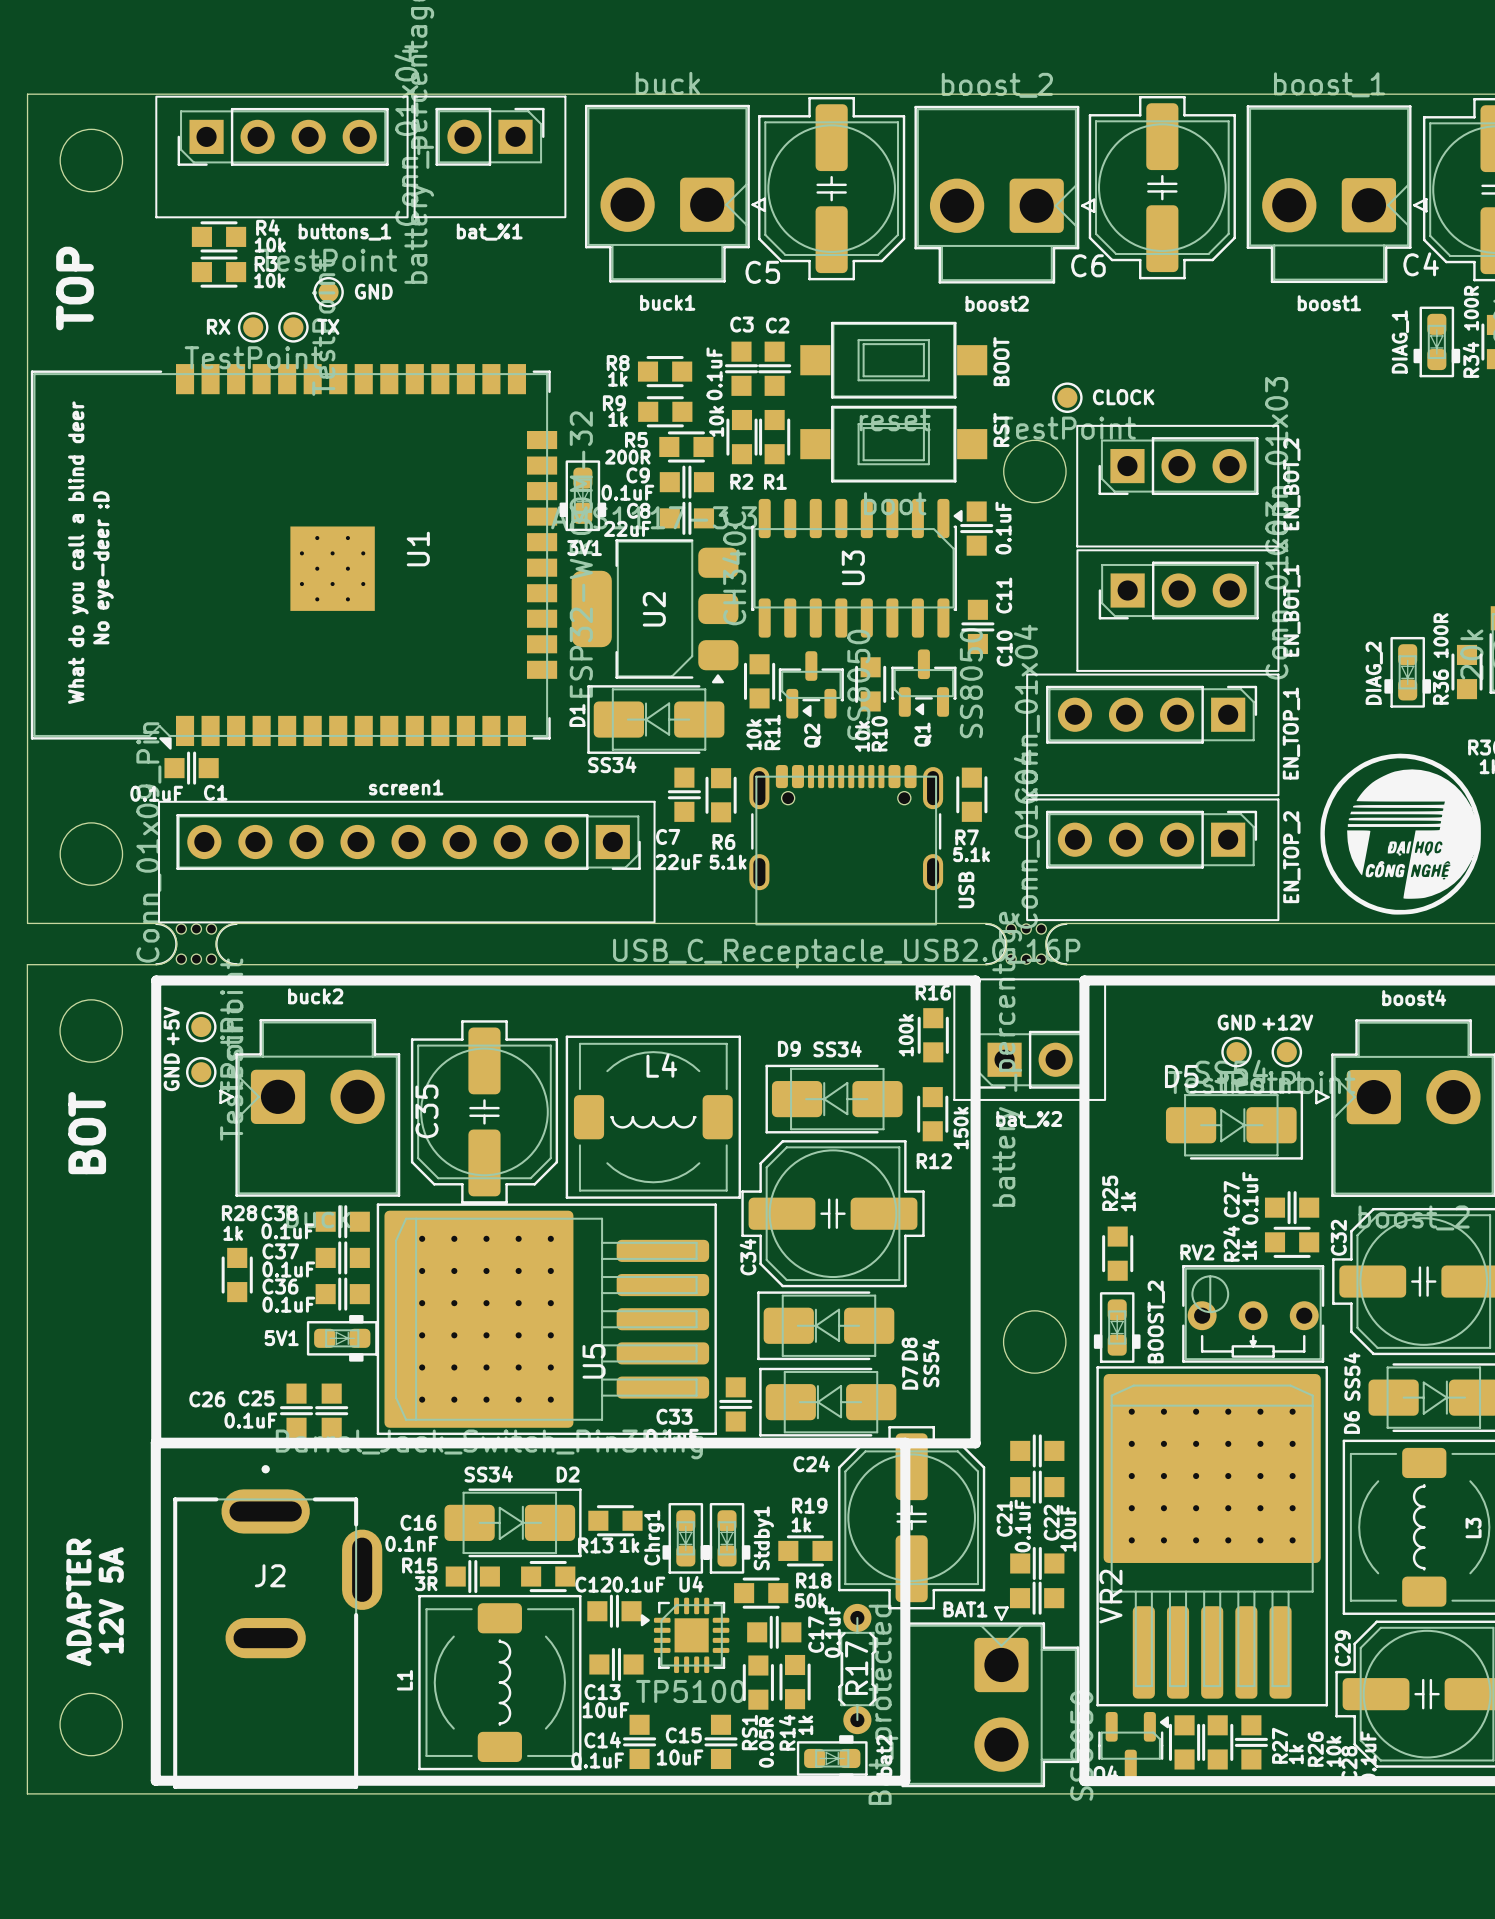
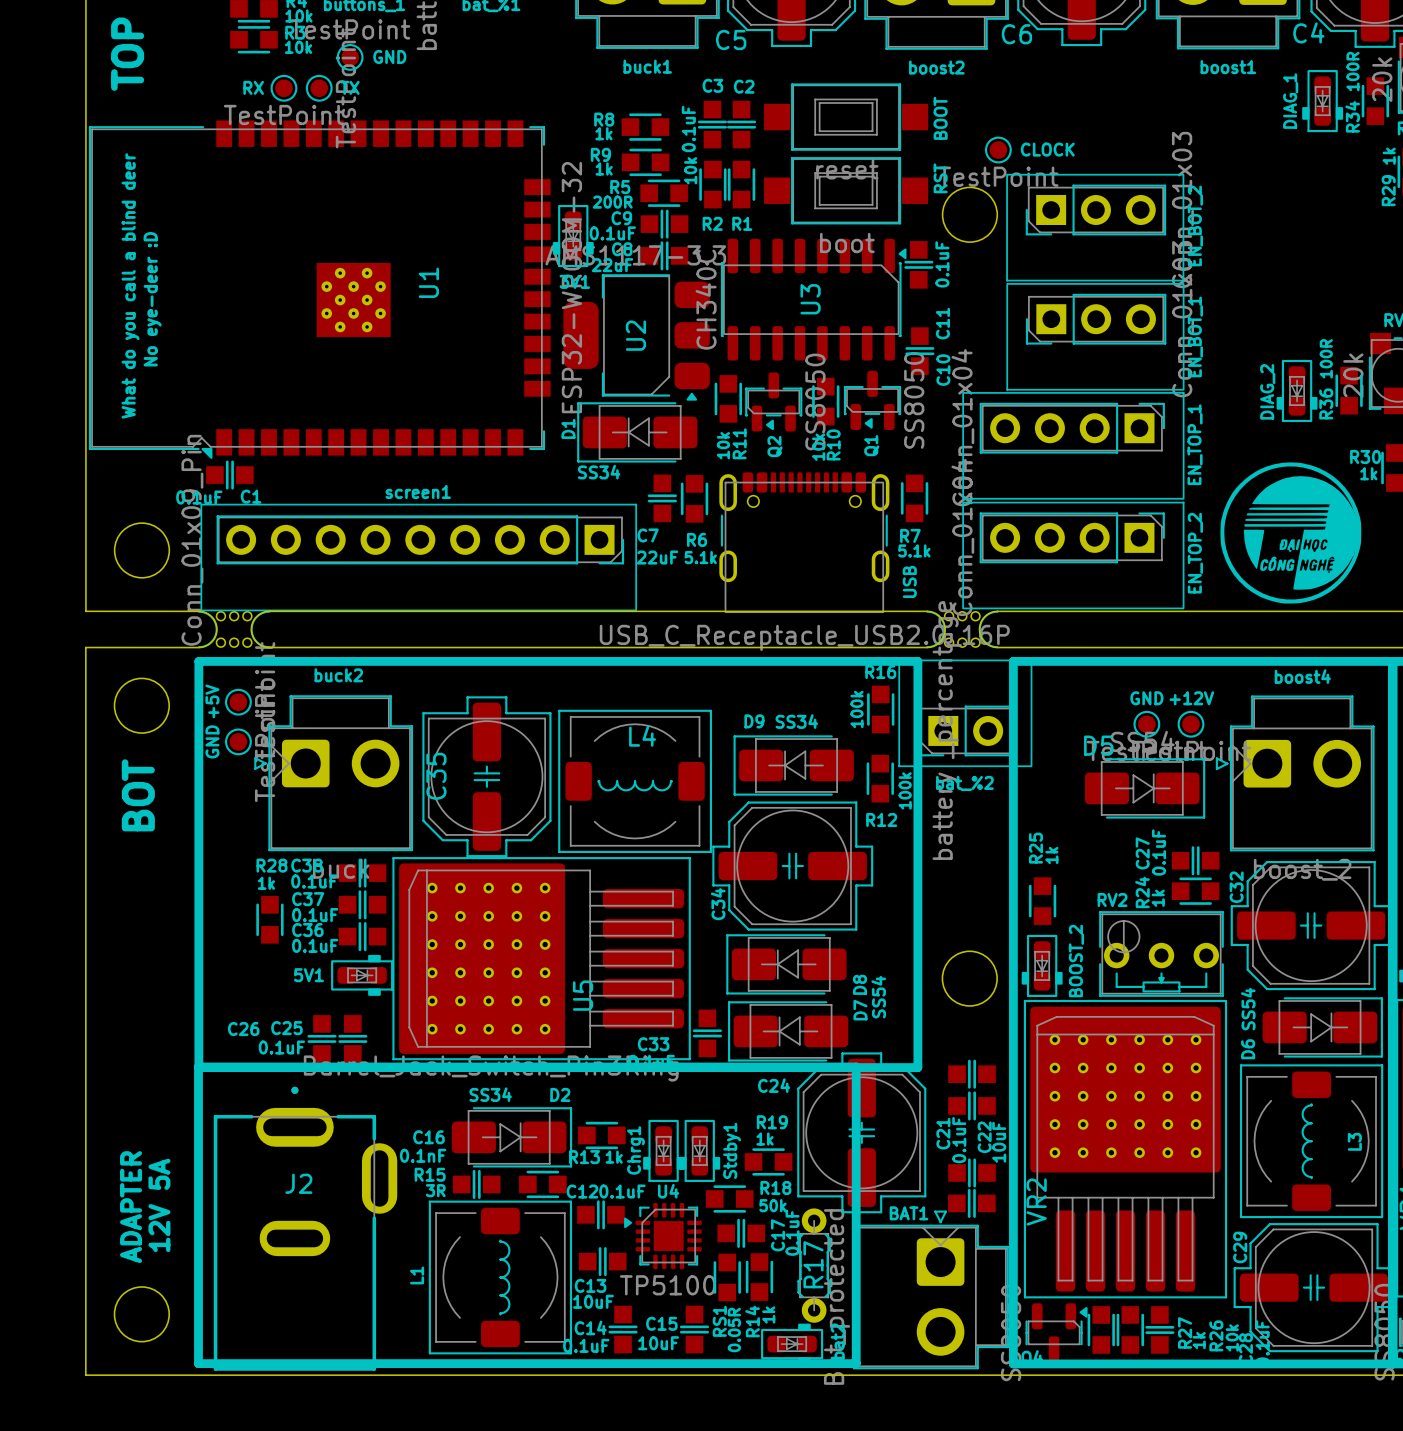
R12 value: 150k (961, 1128) -> 100k (905, 790)

